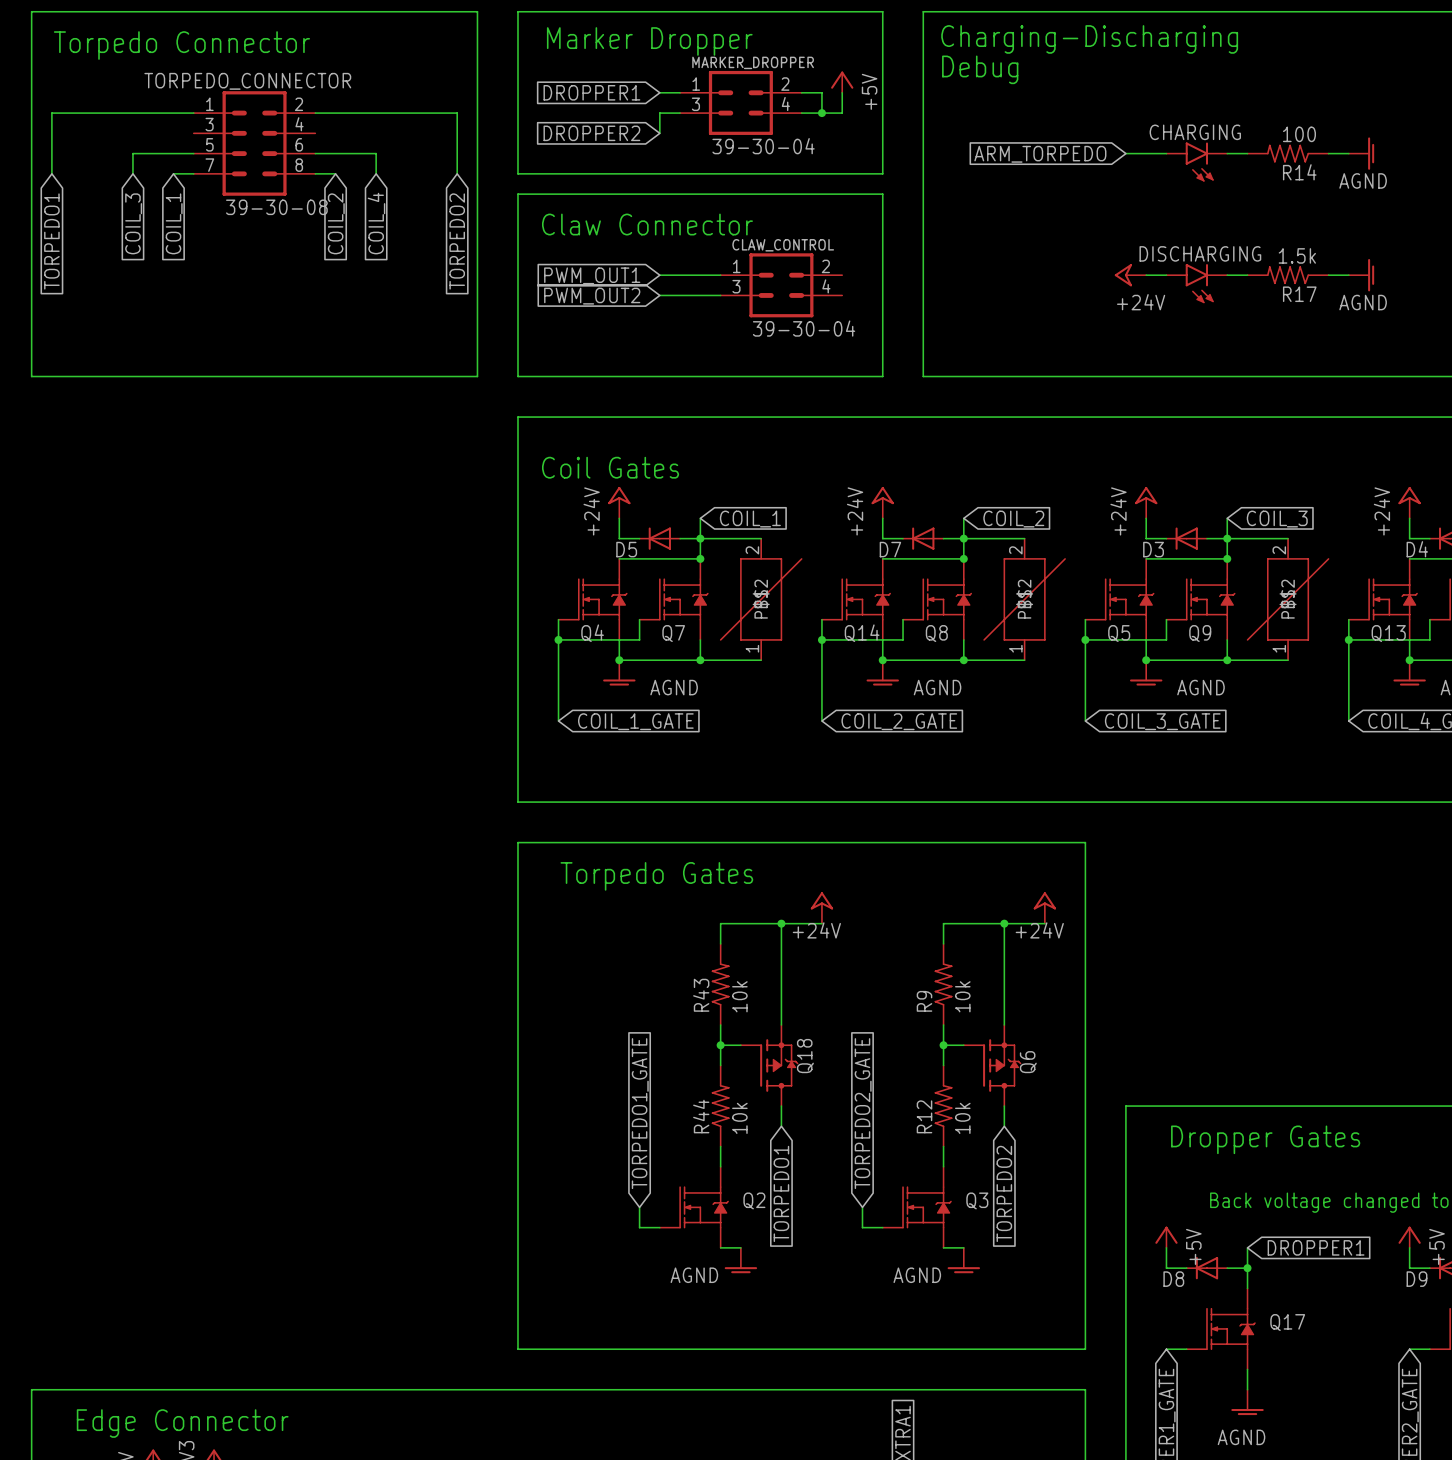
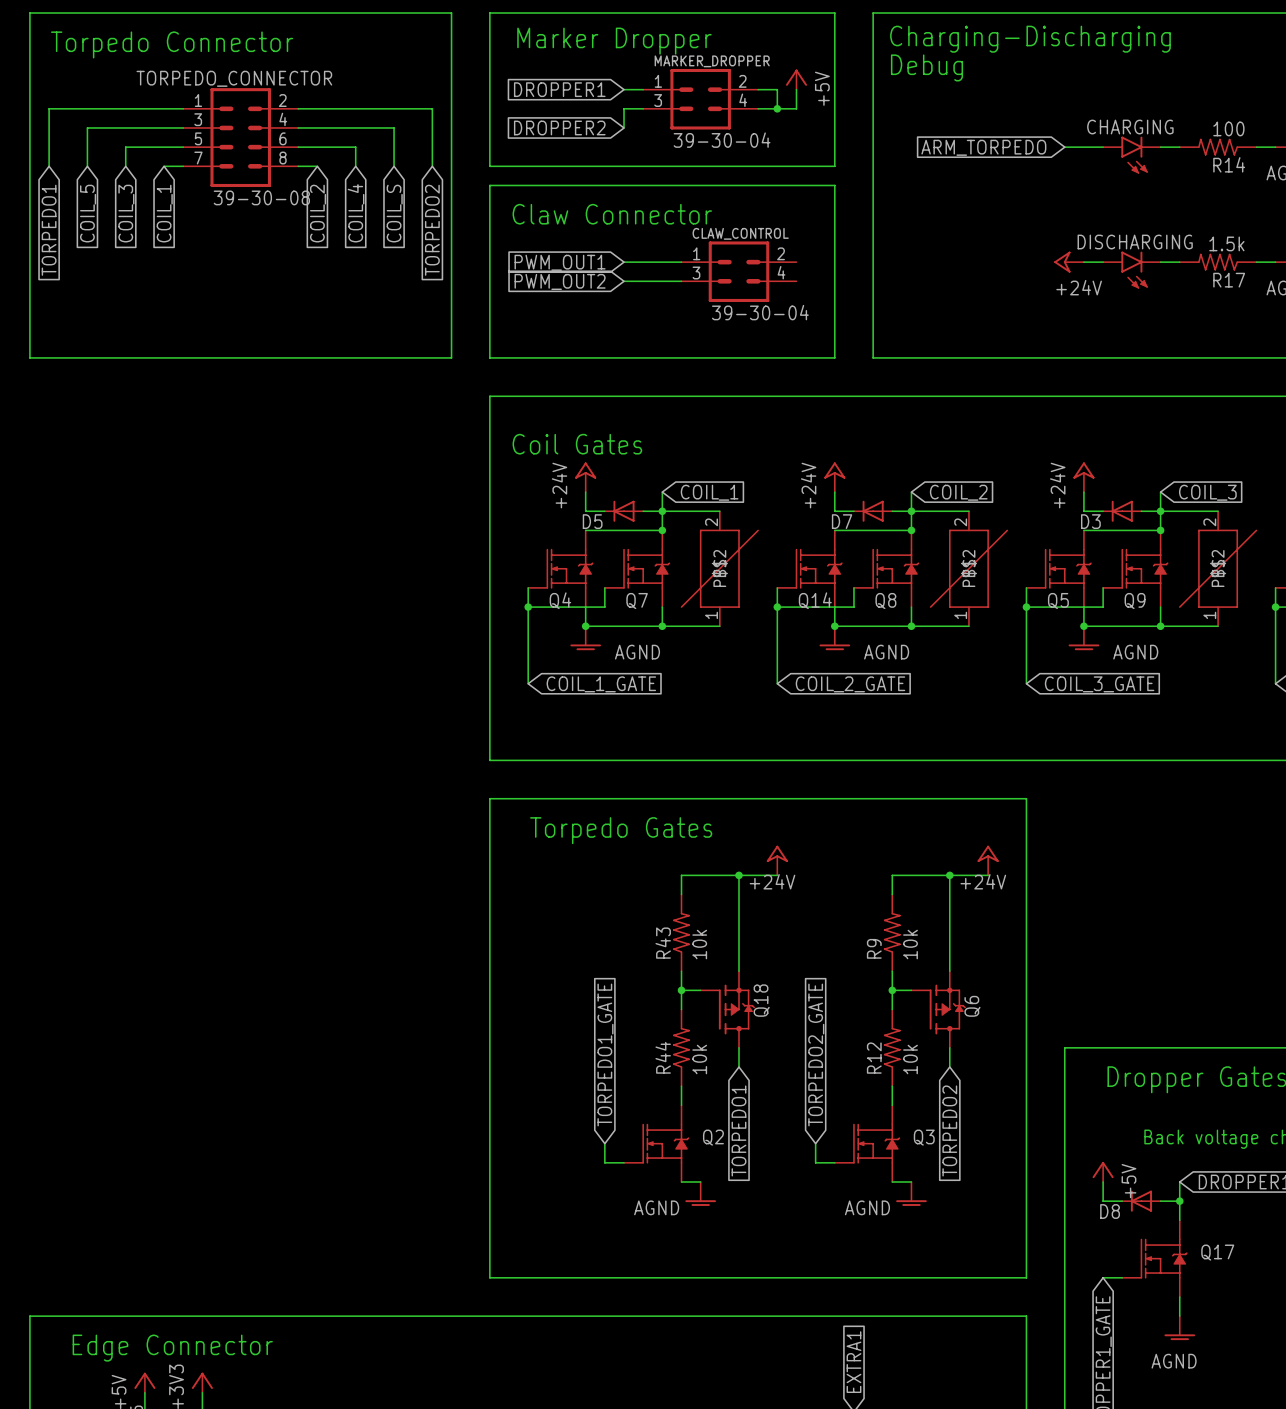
wire: none -> (183, 127) (87, 127) (87, 166)
wire: none -> (298, 127) (394, 127) (394, 166)
global label: none -> COIL_5 (88, 213)
global label: none -> COIL_S (394, 213)

